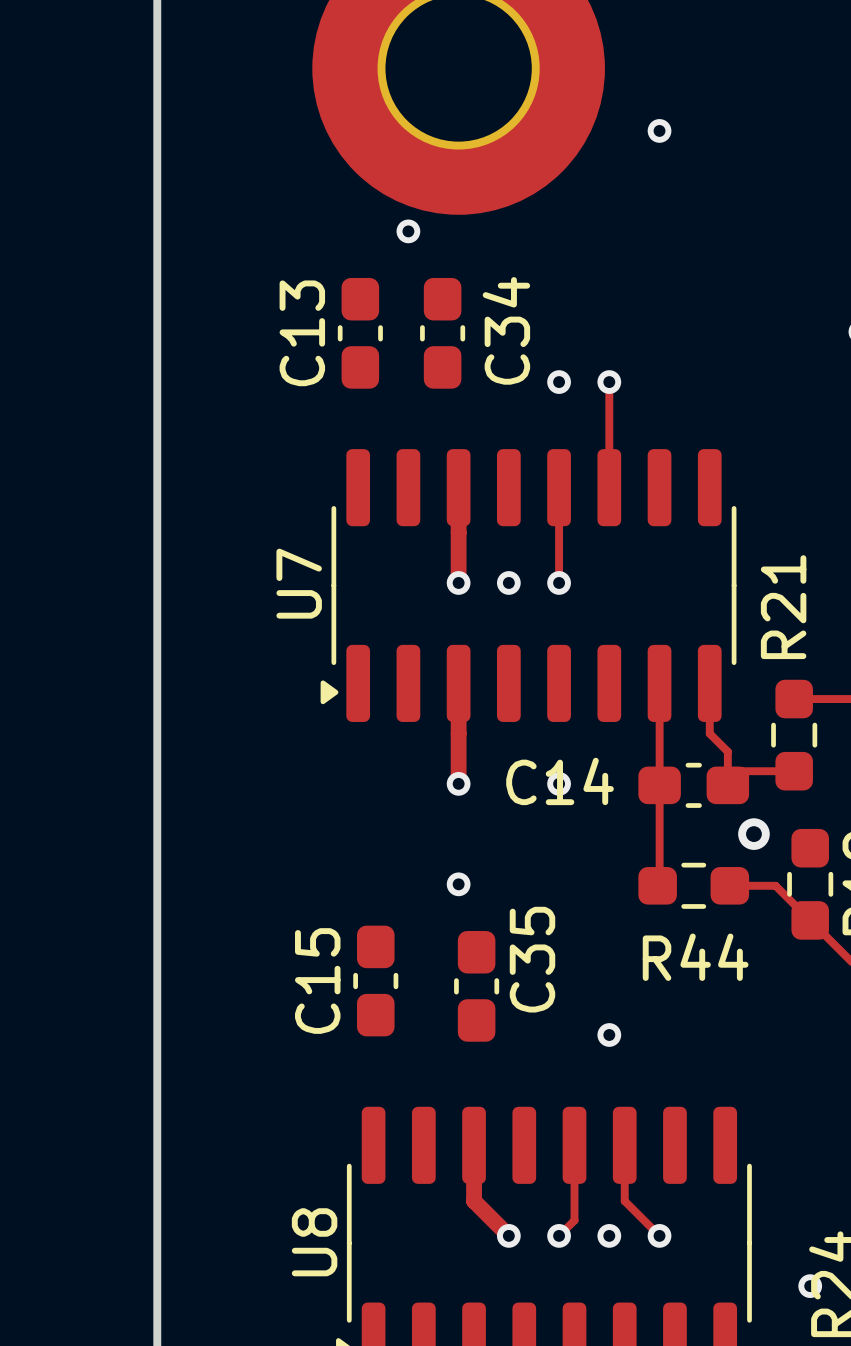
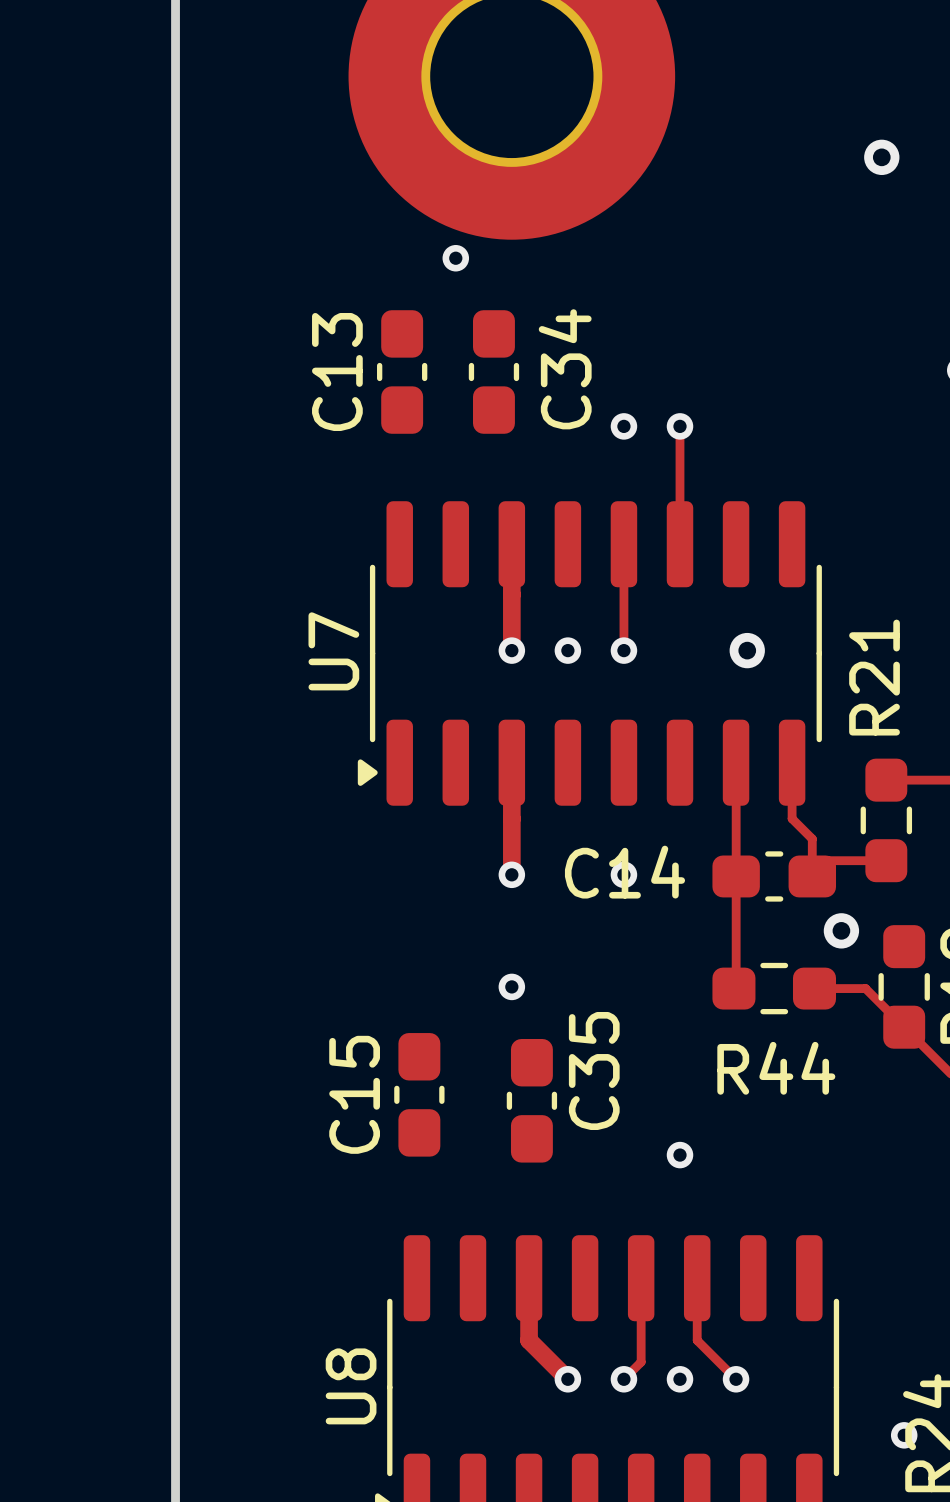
via: (659, 130) -> none
via: none -> (881, 157)
via: none -> (747, 650)

